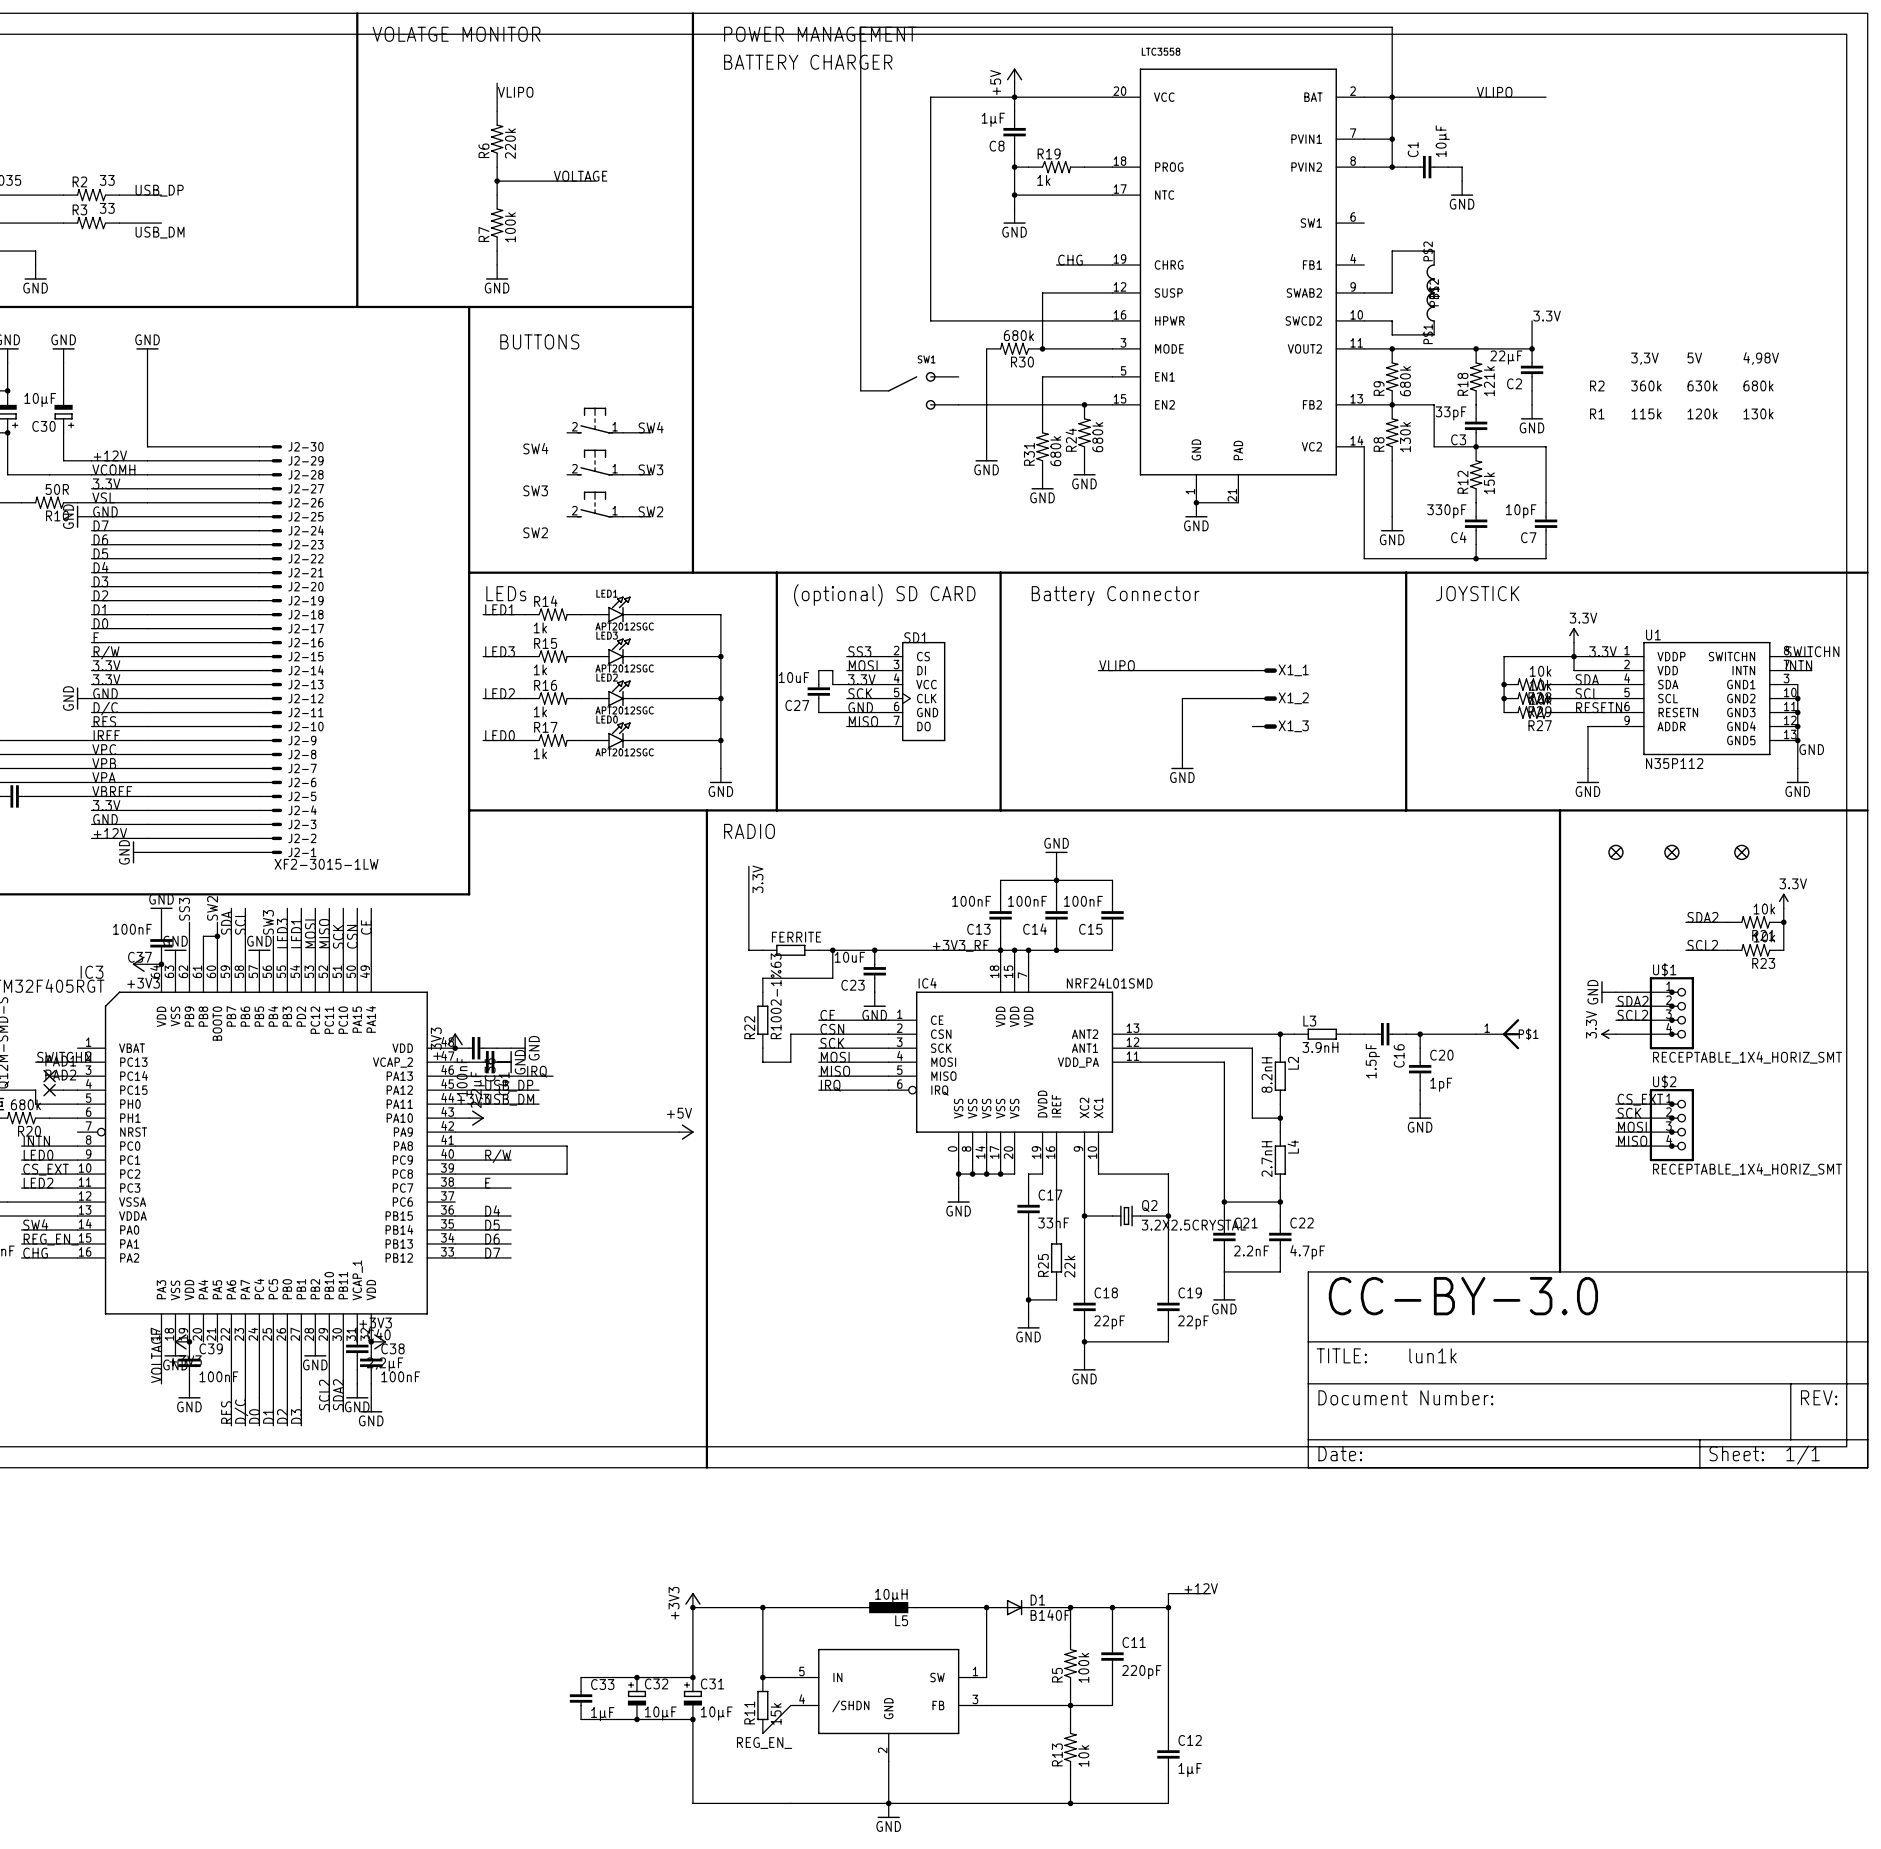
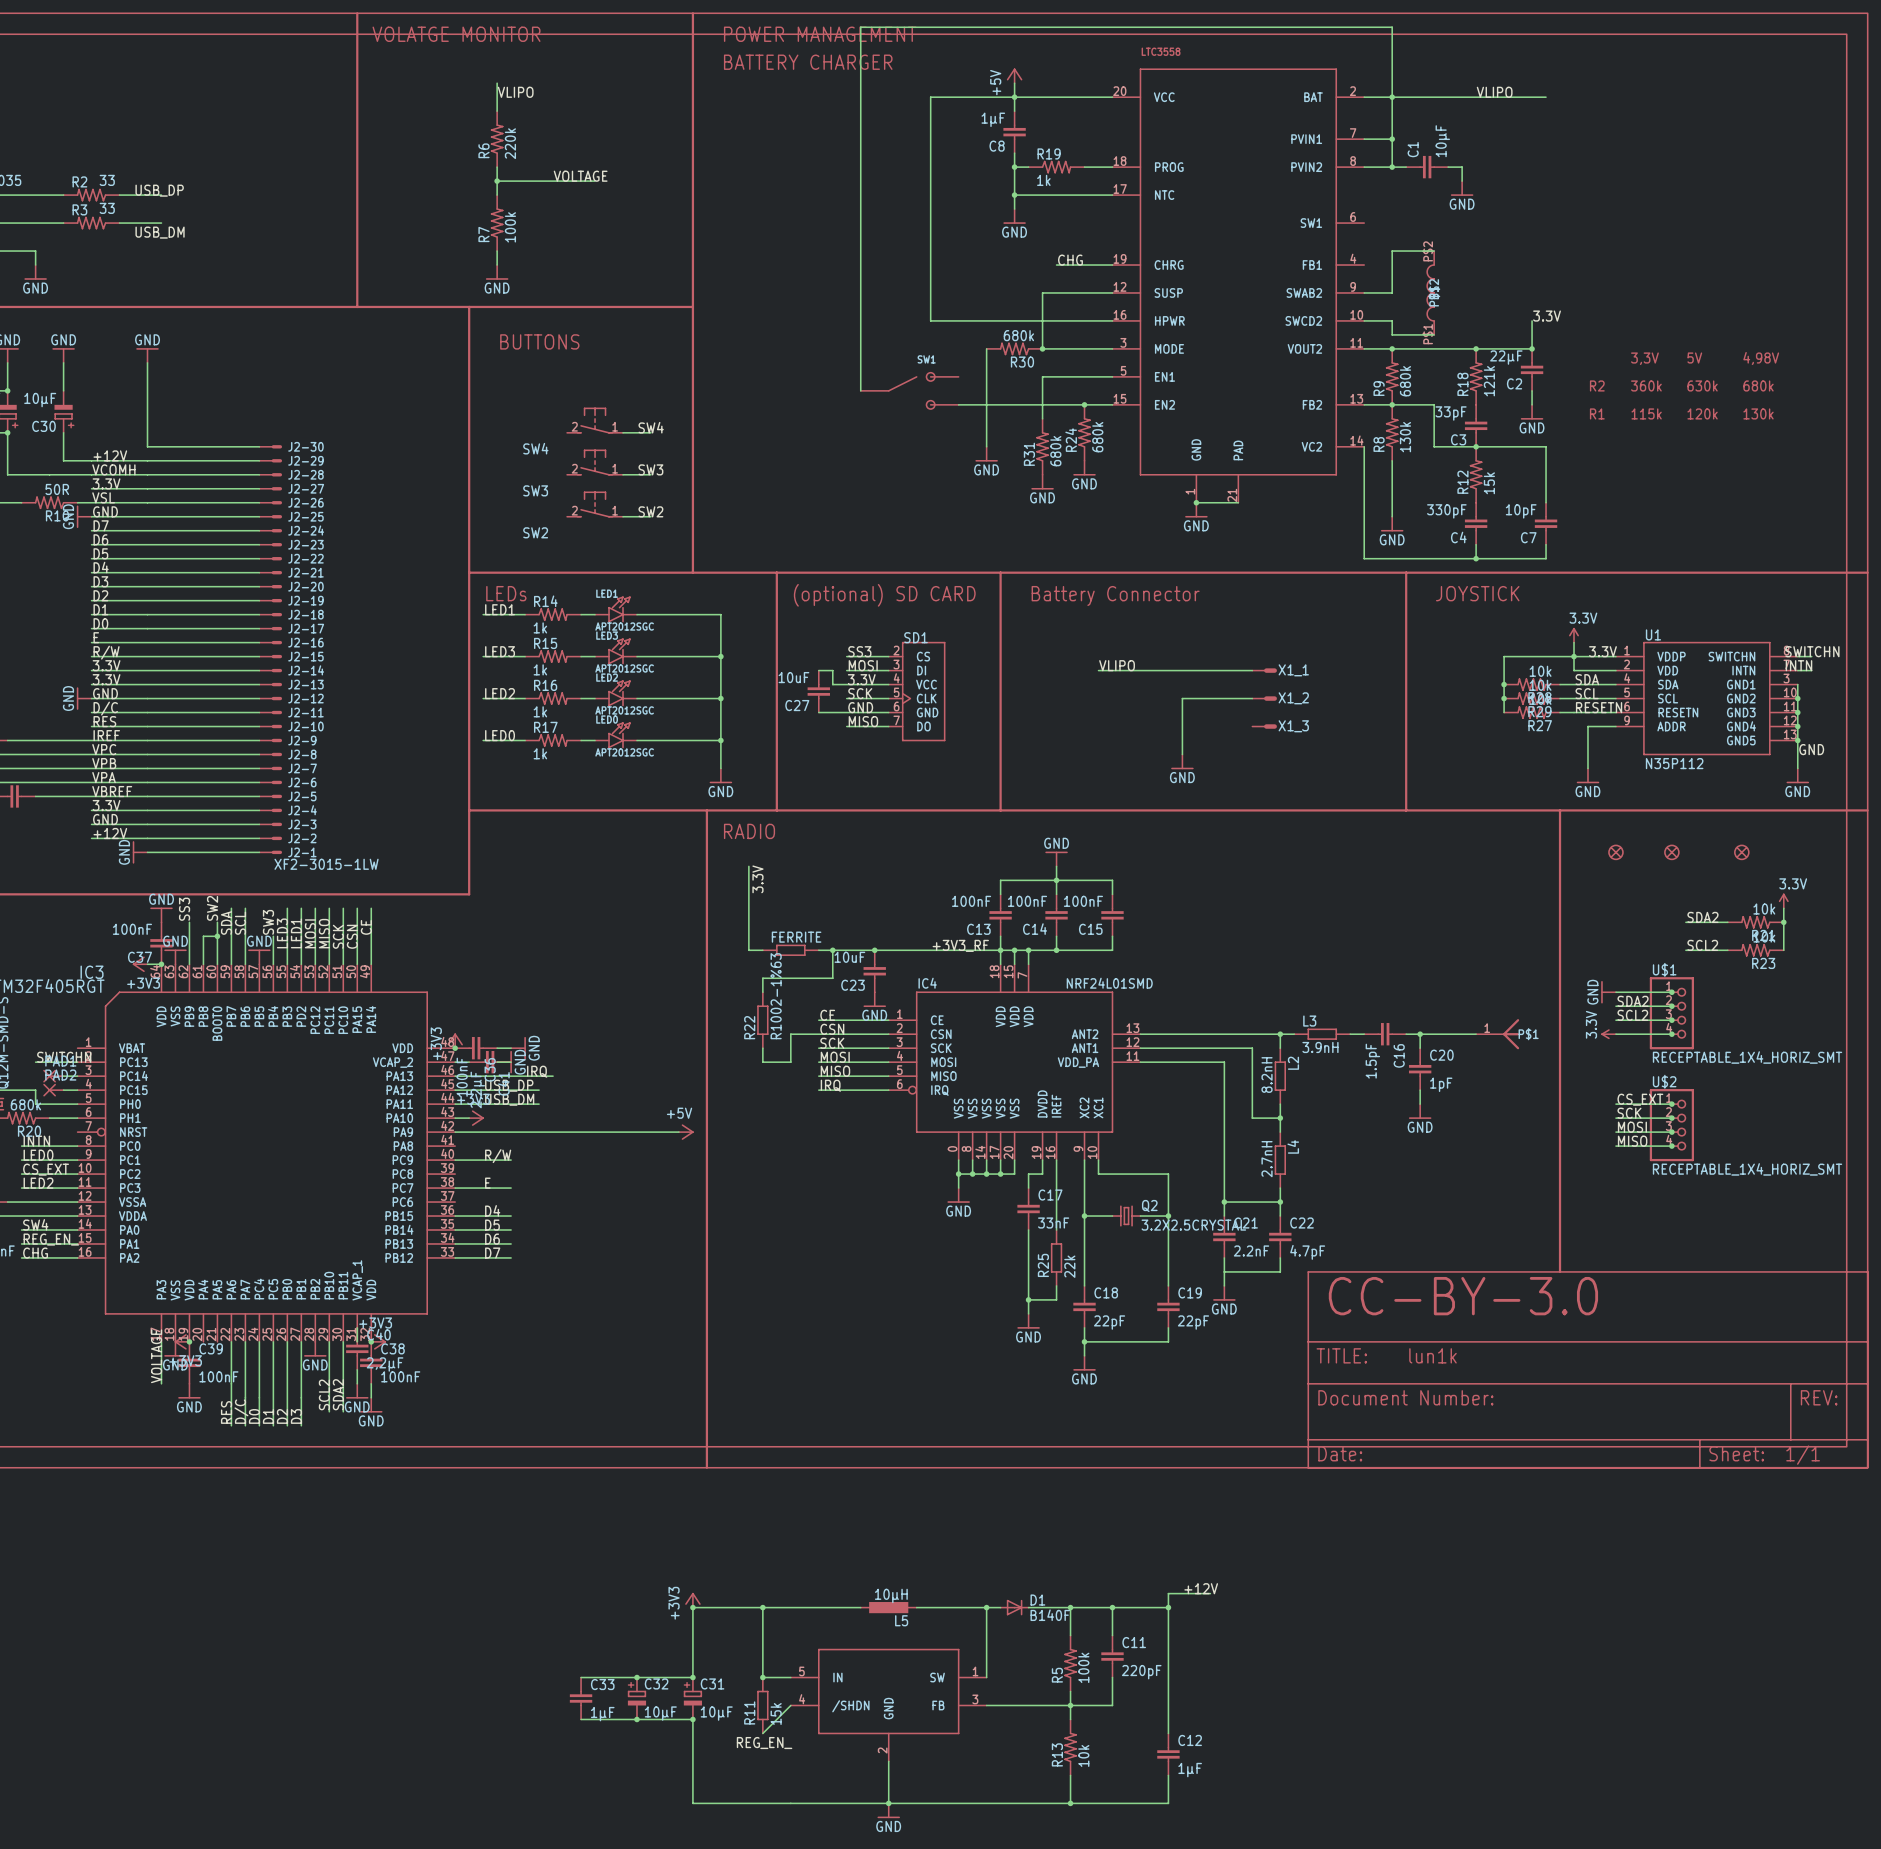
wire: (455, 1146) (567, 1146) (567, 1174) (455, 1174) -> none

